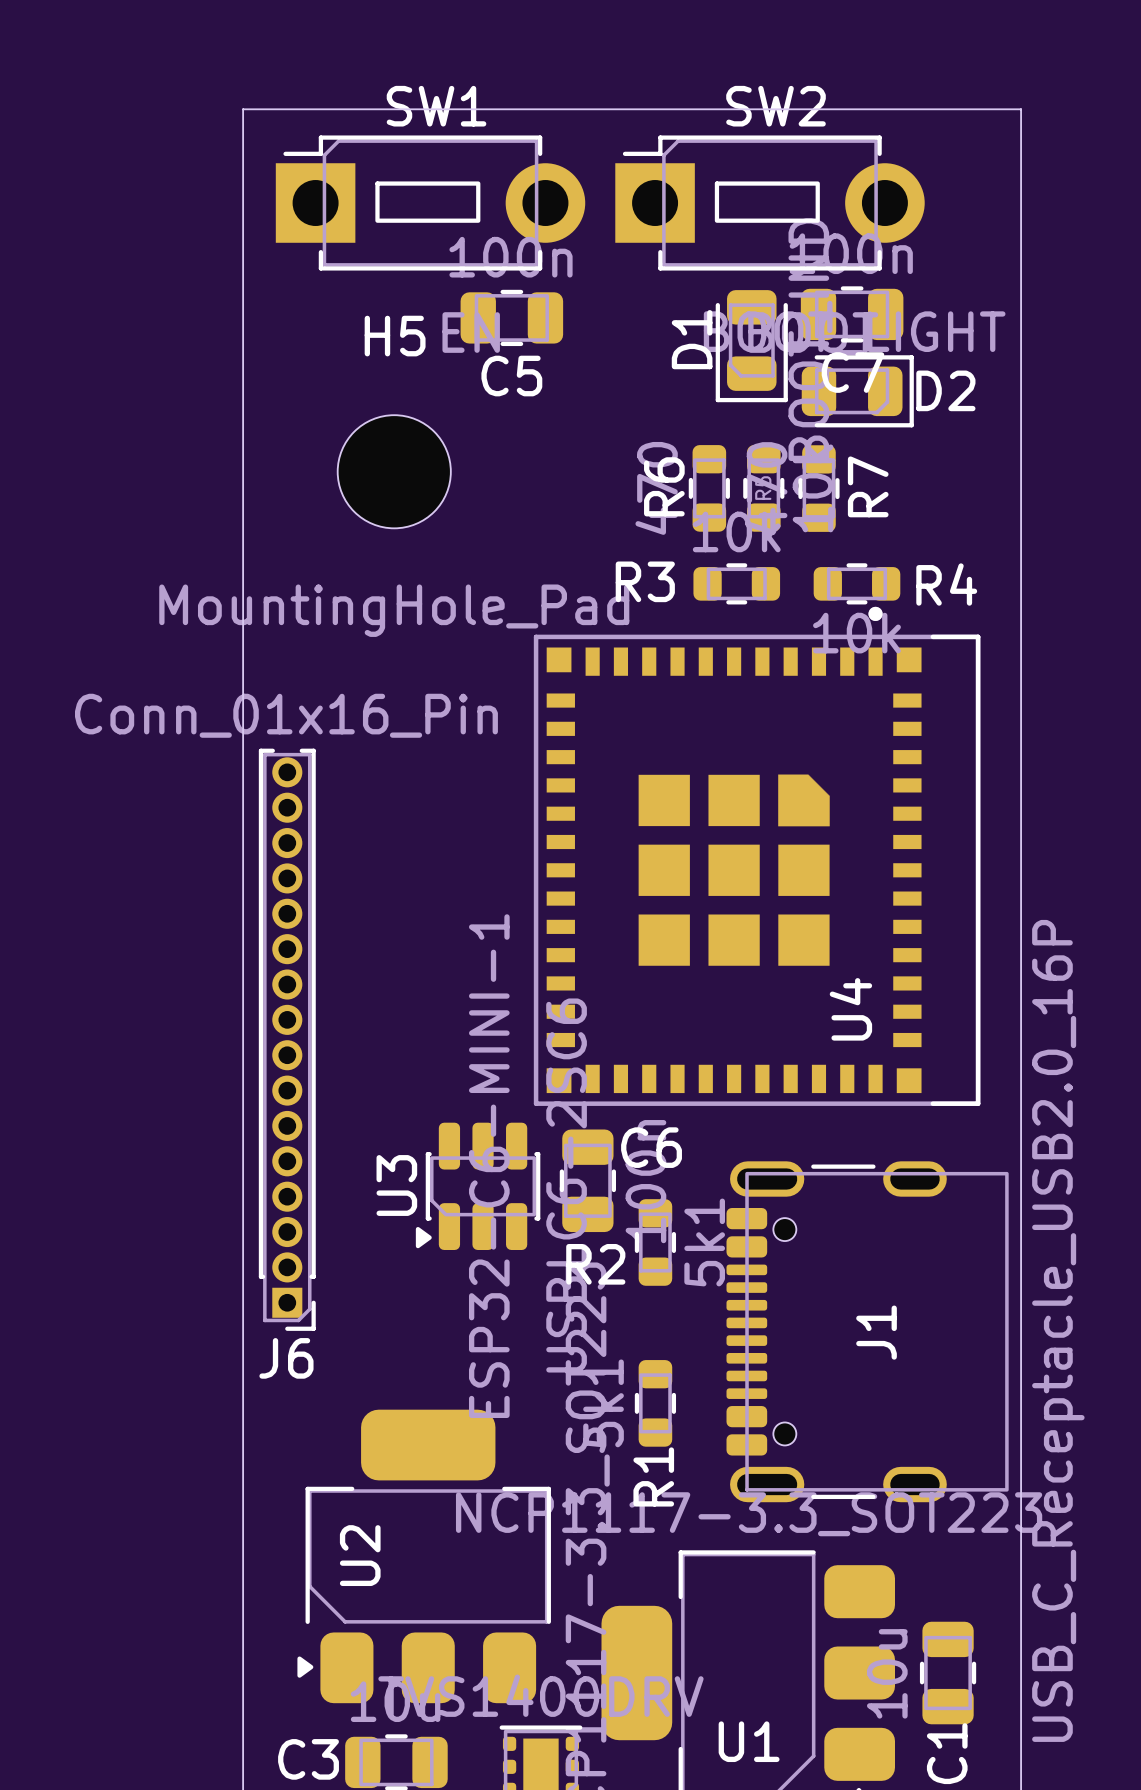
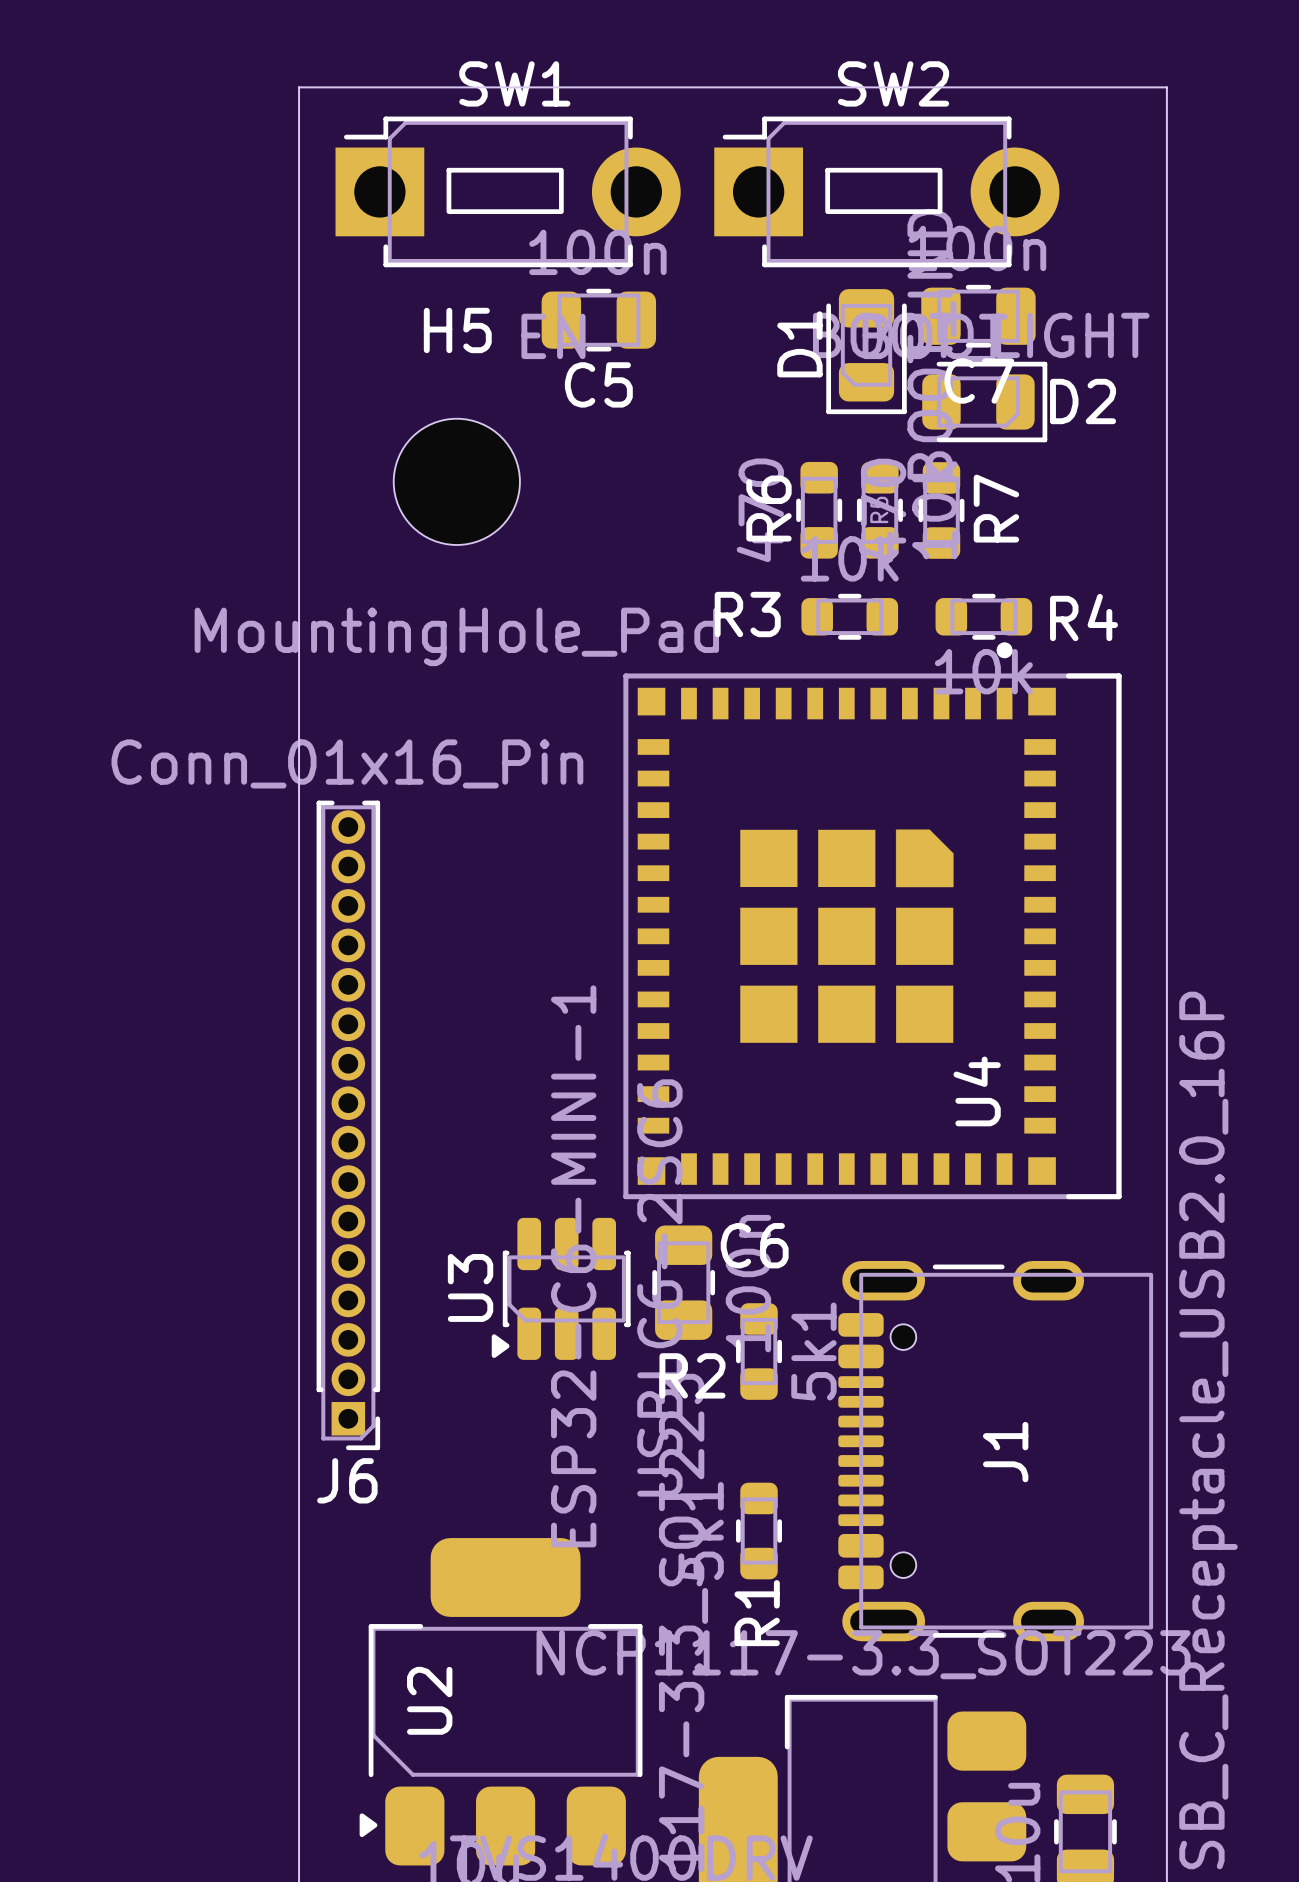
H5 position: (394, 471) -> (456, 481)

